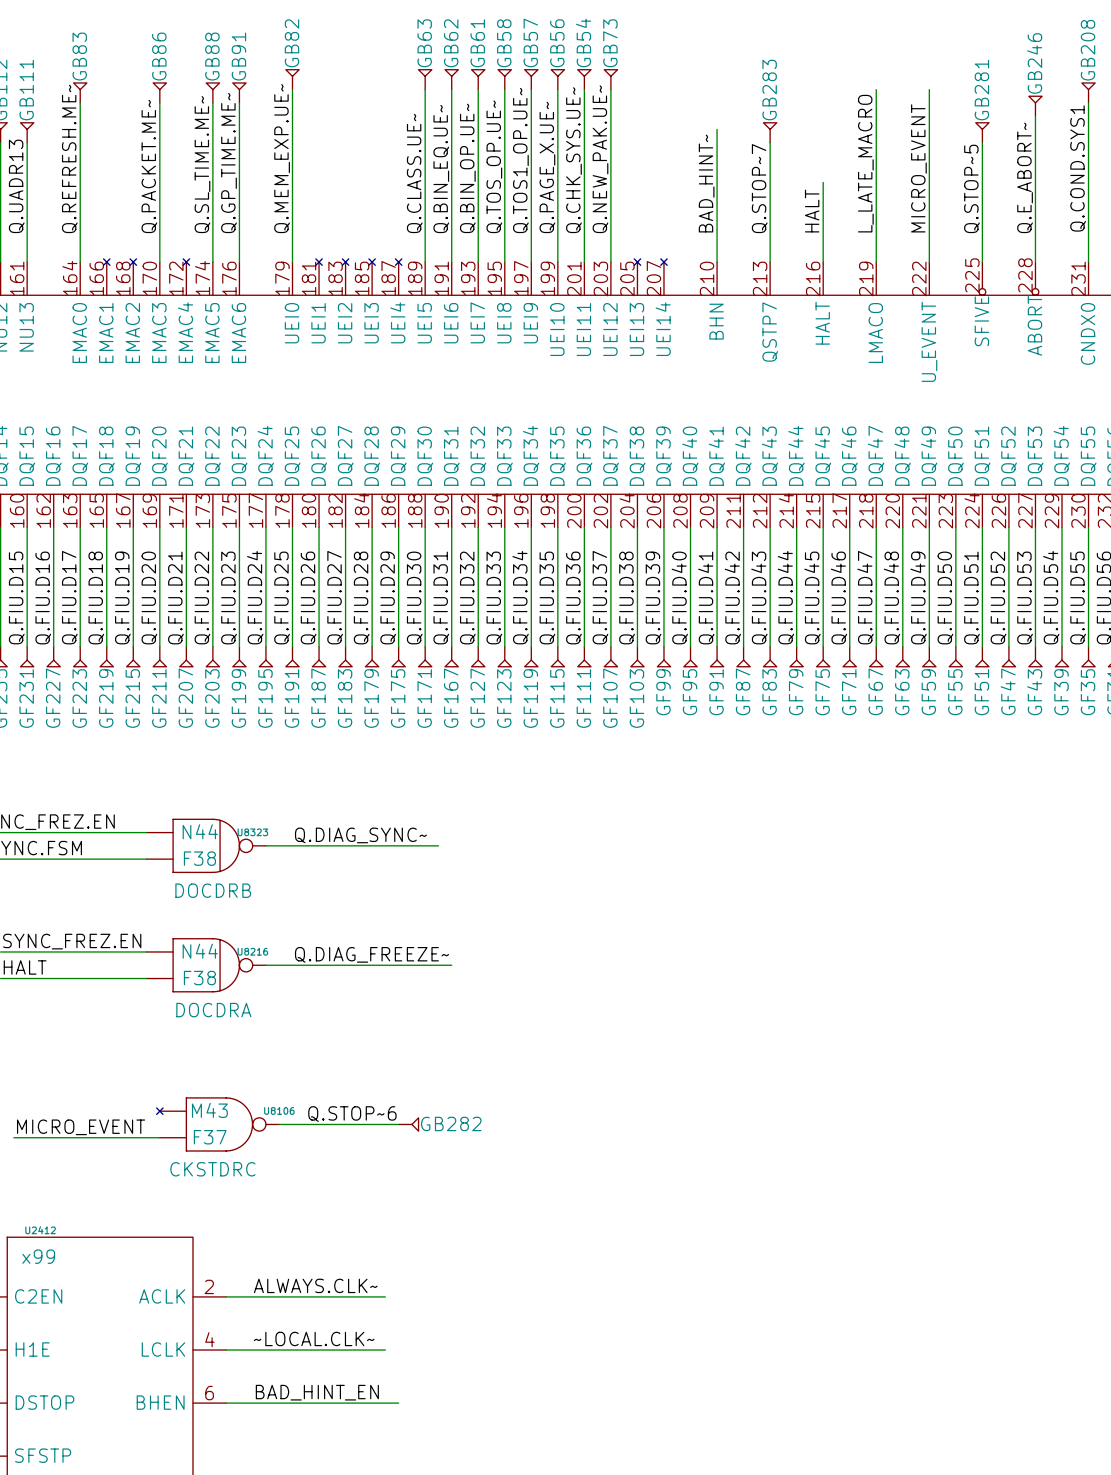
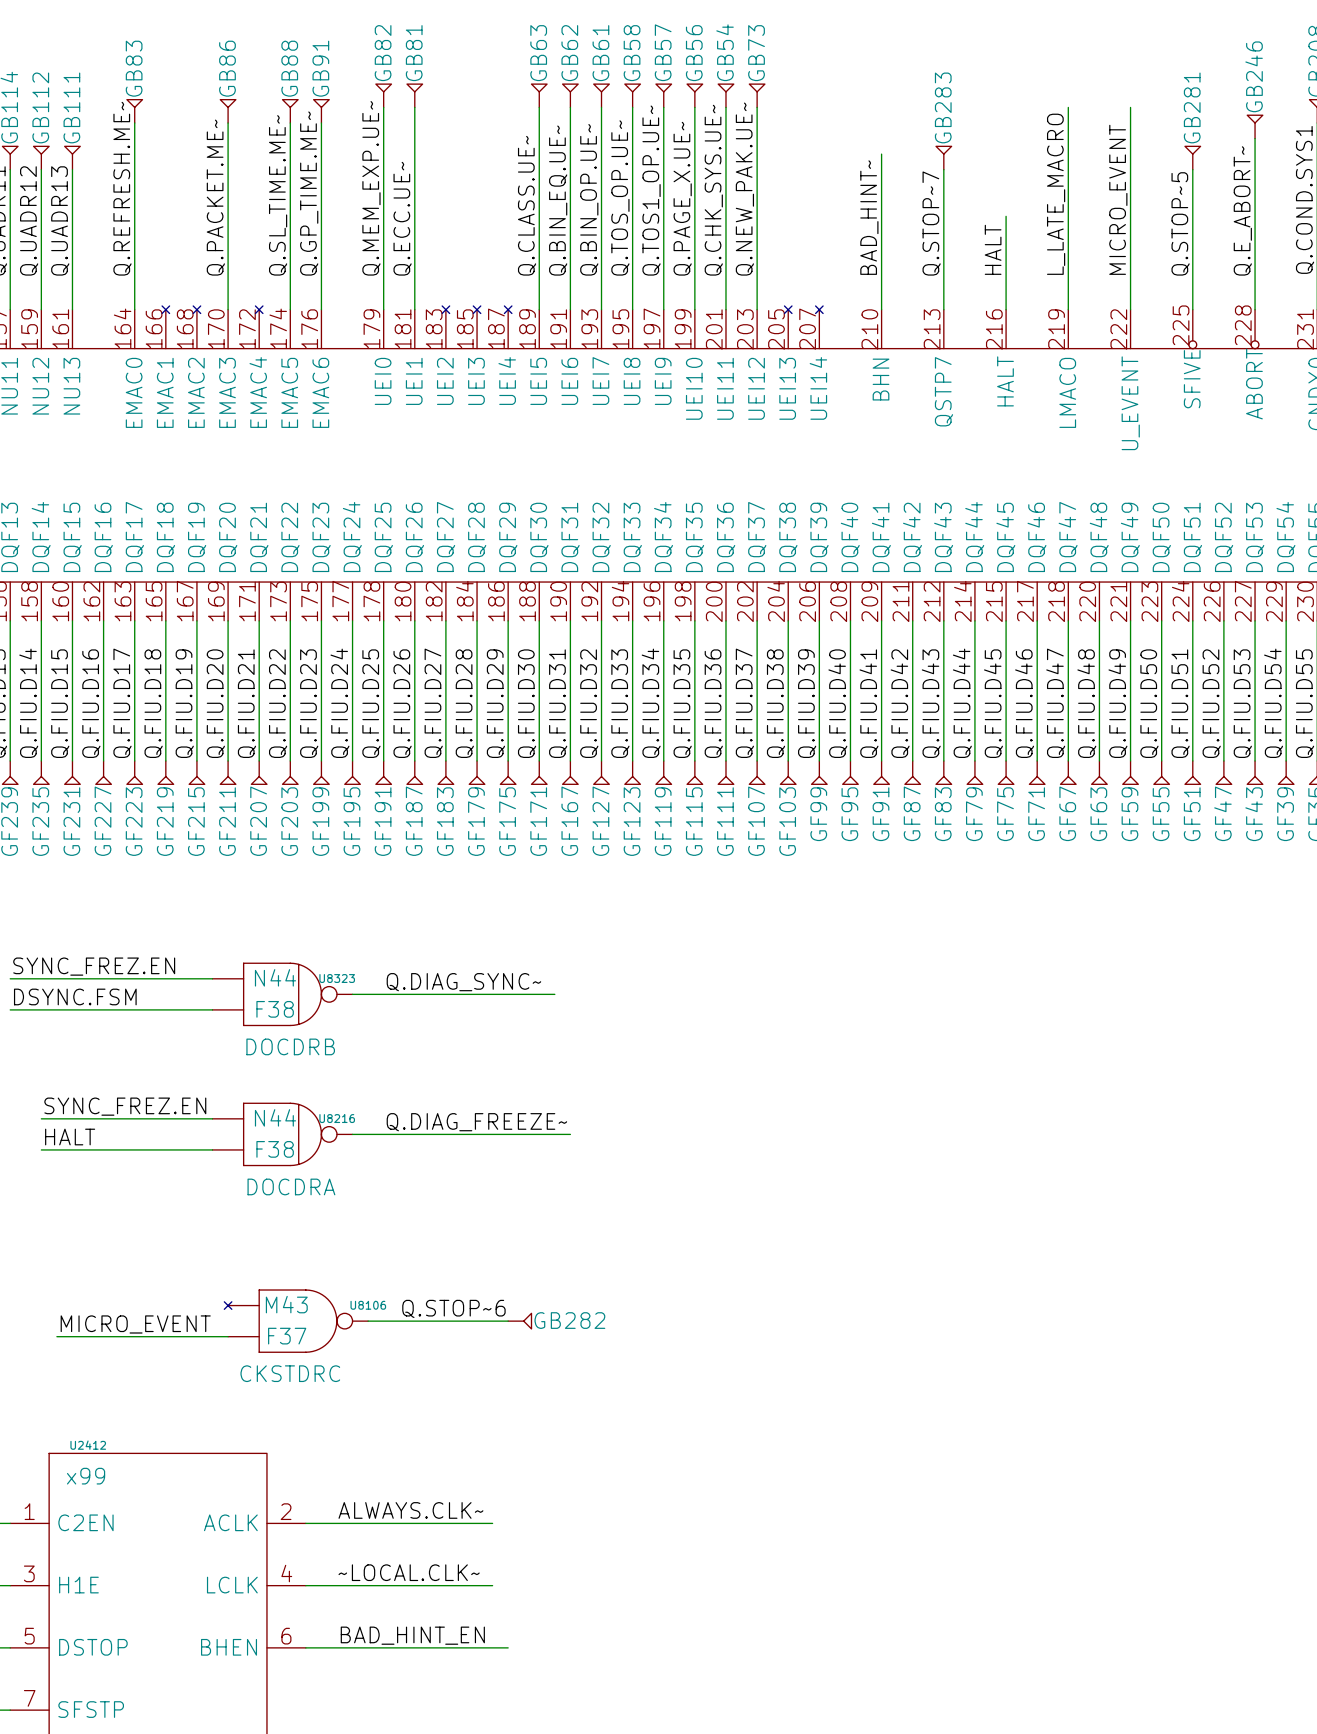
GB81: none -> (414, 95)
wire: none -> (414, 107) (414, 309)
label: none -> Q.ECC.UE~ (402, 218)
no-connect mark: (319, 262) -> none

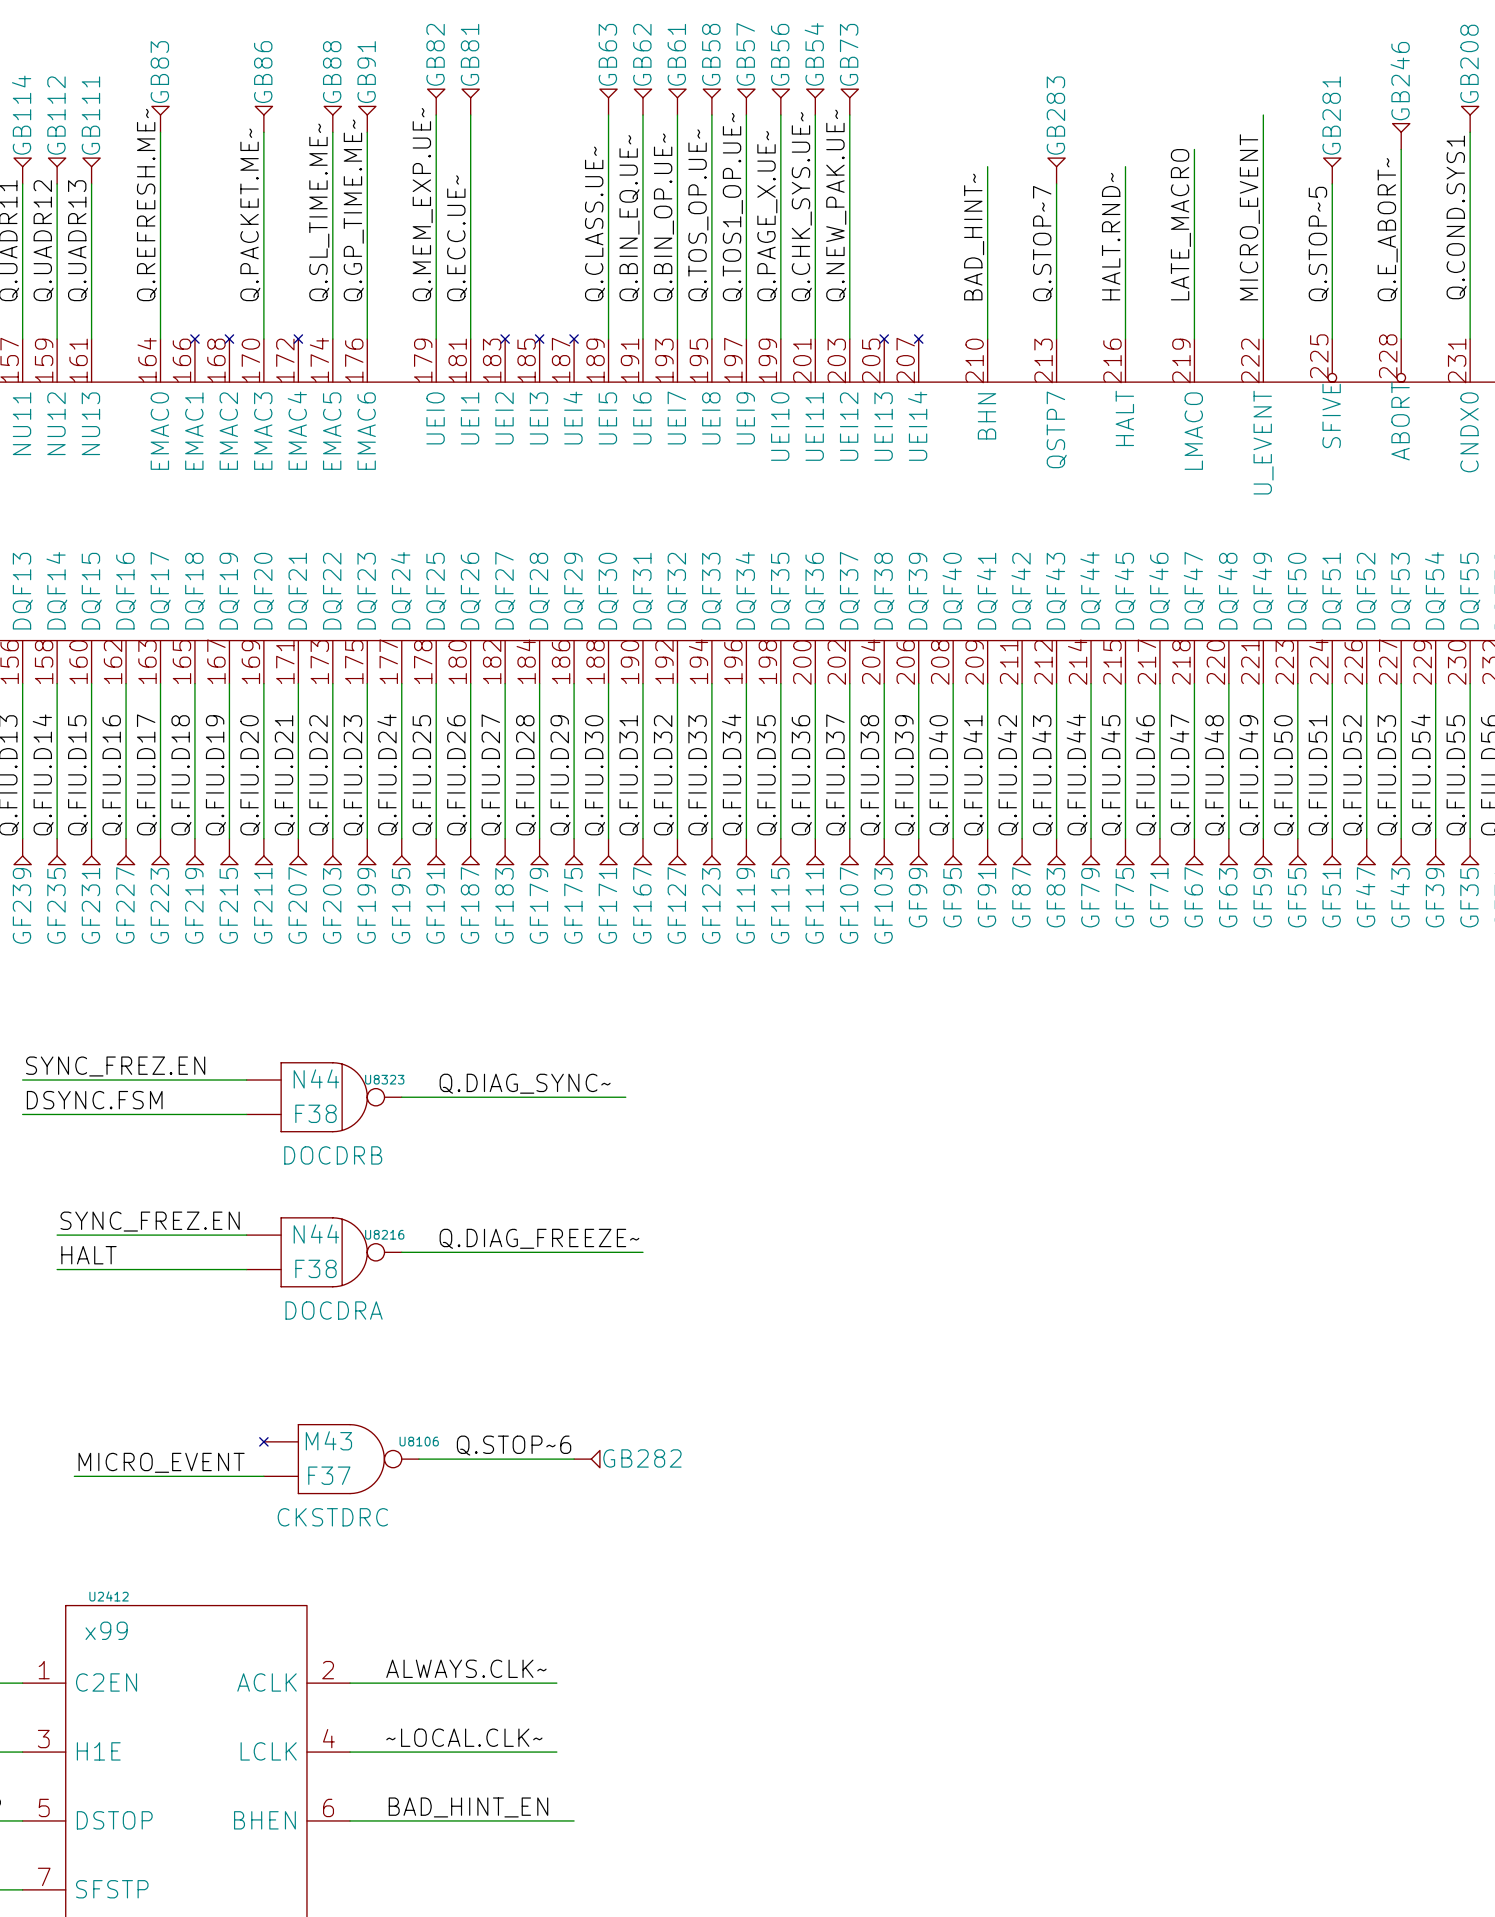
wire: (1068, 107) (1068, 138) -> none
wire: none -> (1125, 166) (1125, 235)
label: L_LATE_MACRO (1056, 194) -> LATE_MACRO (1180, 224)
label: HALT (993, 249) -> HALT.RND~ (1111, 236)

